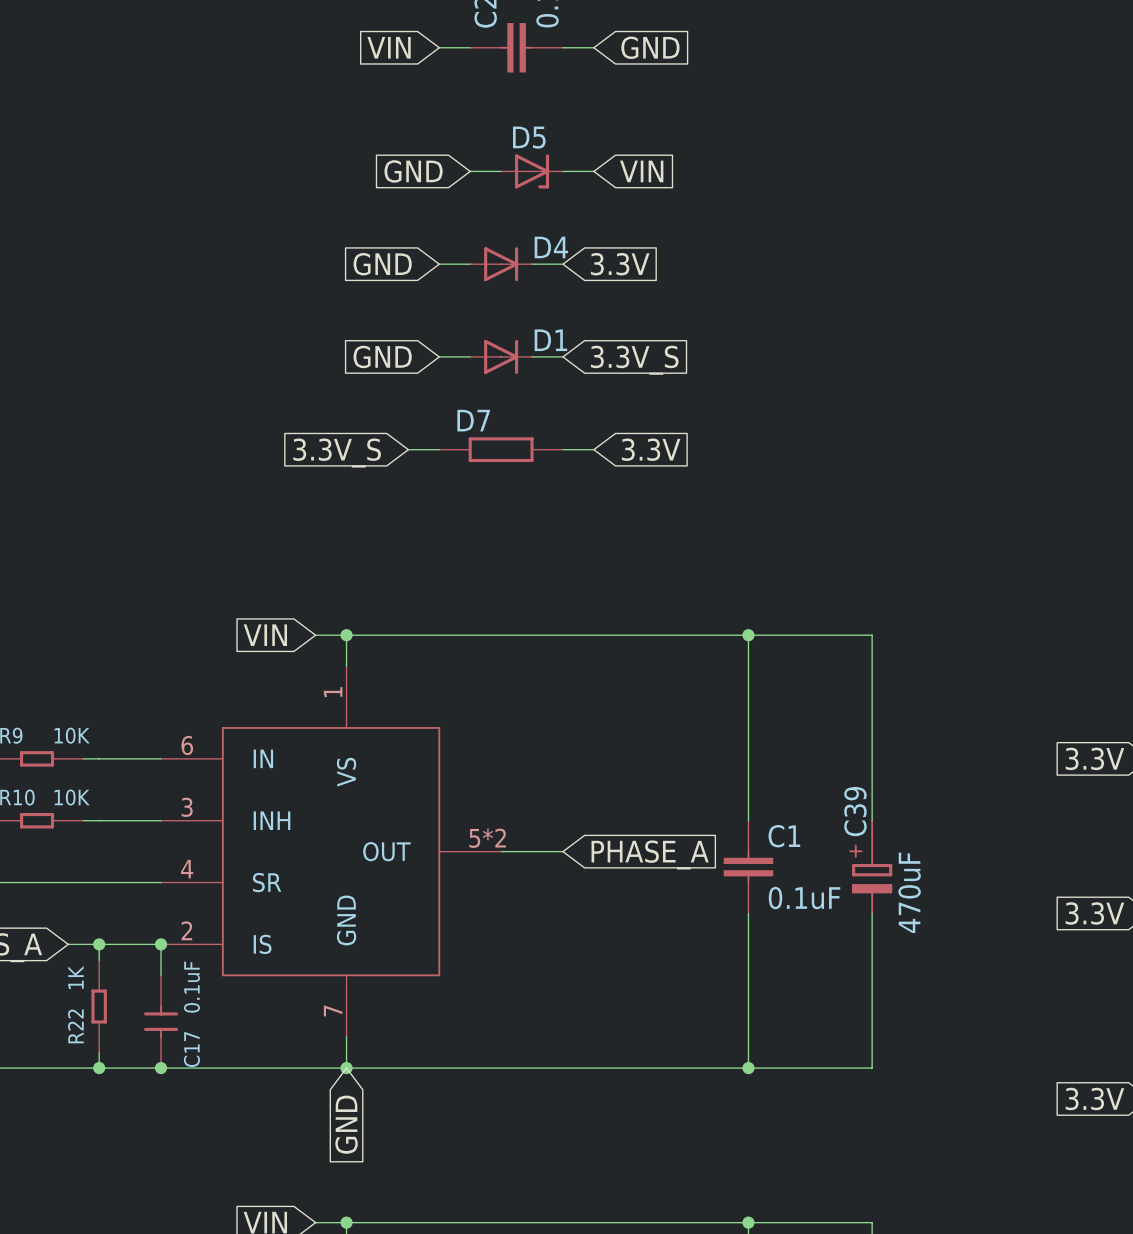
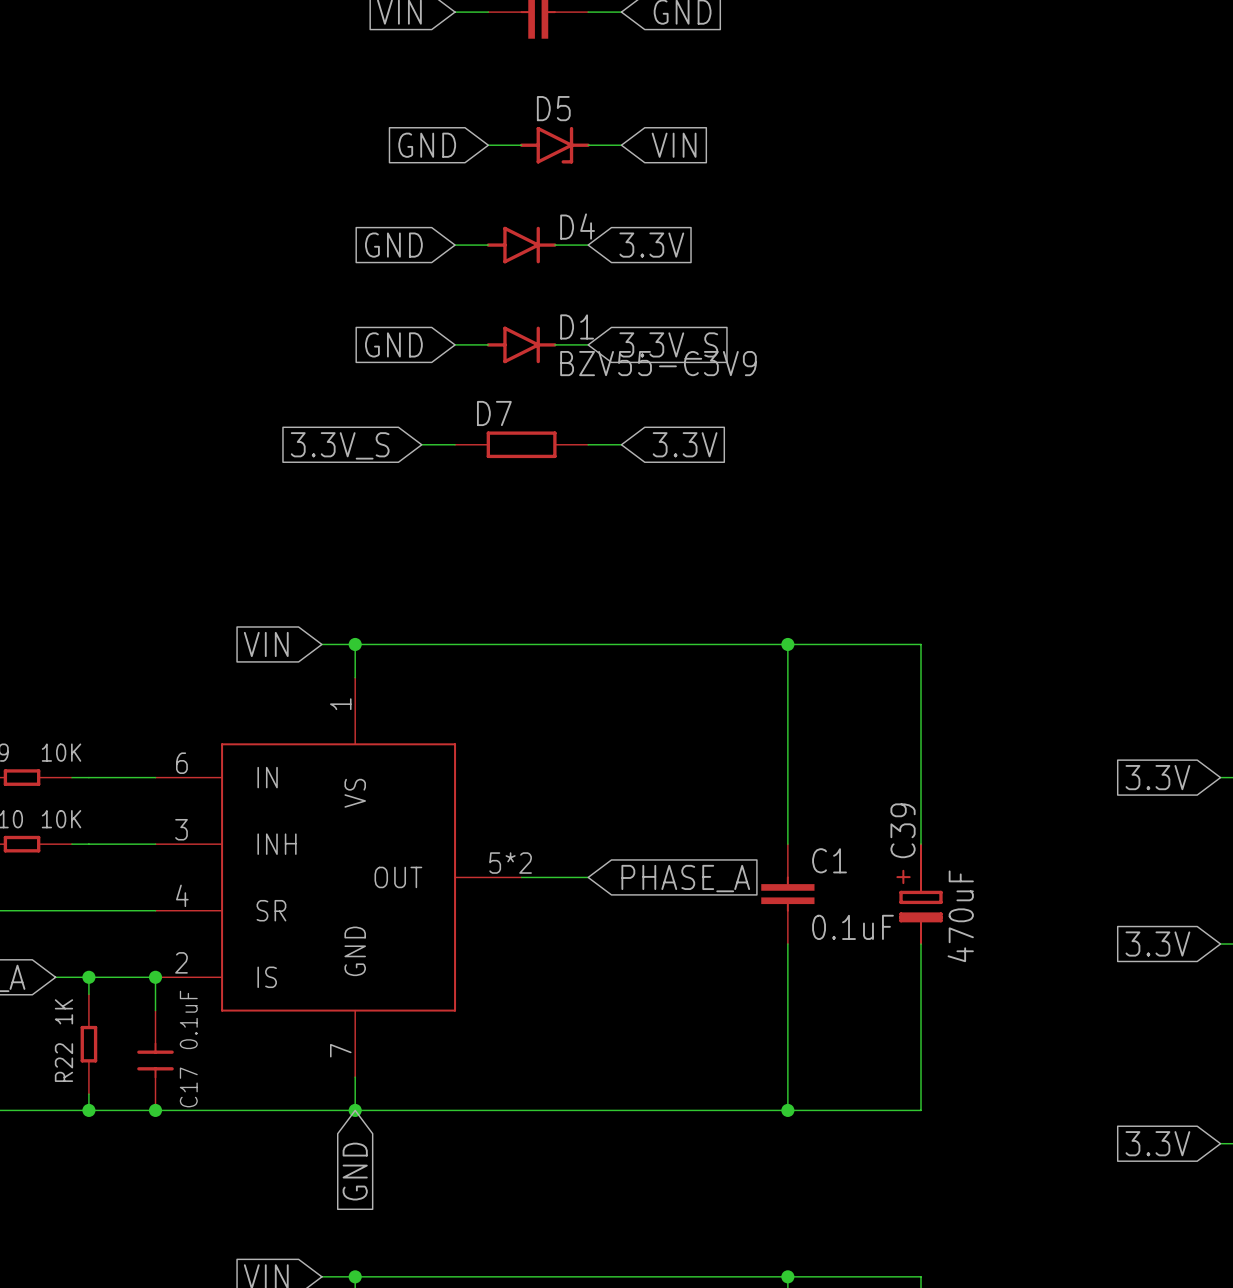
D5 symbol: [501, 154, 563, 189] -> [519, 126, 590, 164]
D4 symbol: [470, 247, 533, 282] -> [486, 226, 557, 264]
D1 symbol: [470, 339, 533, 374] -> [486, 326, 557, 364]
D1 value: none -> BZV55-C3V9 (658, 363)

